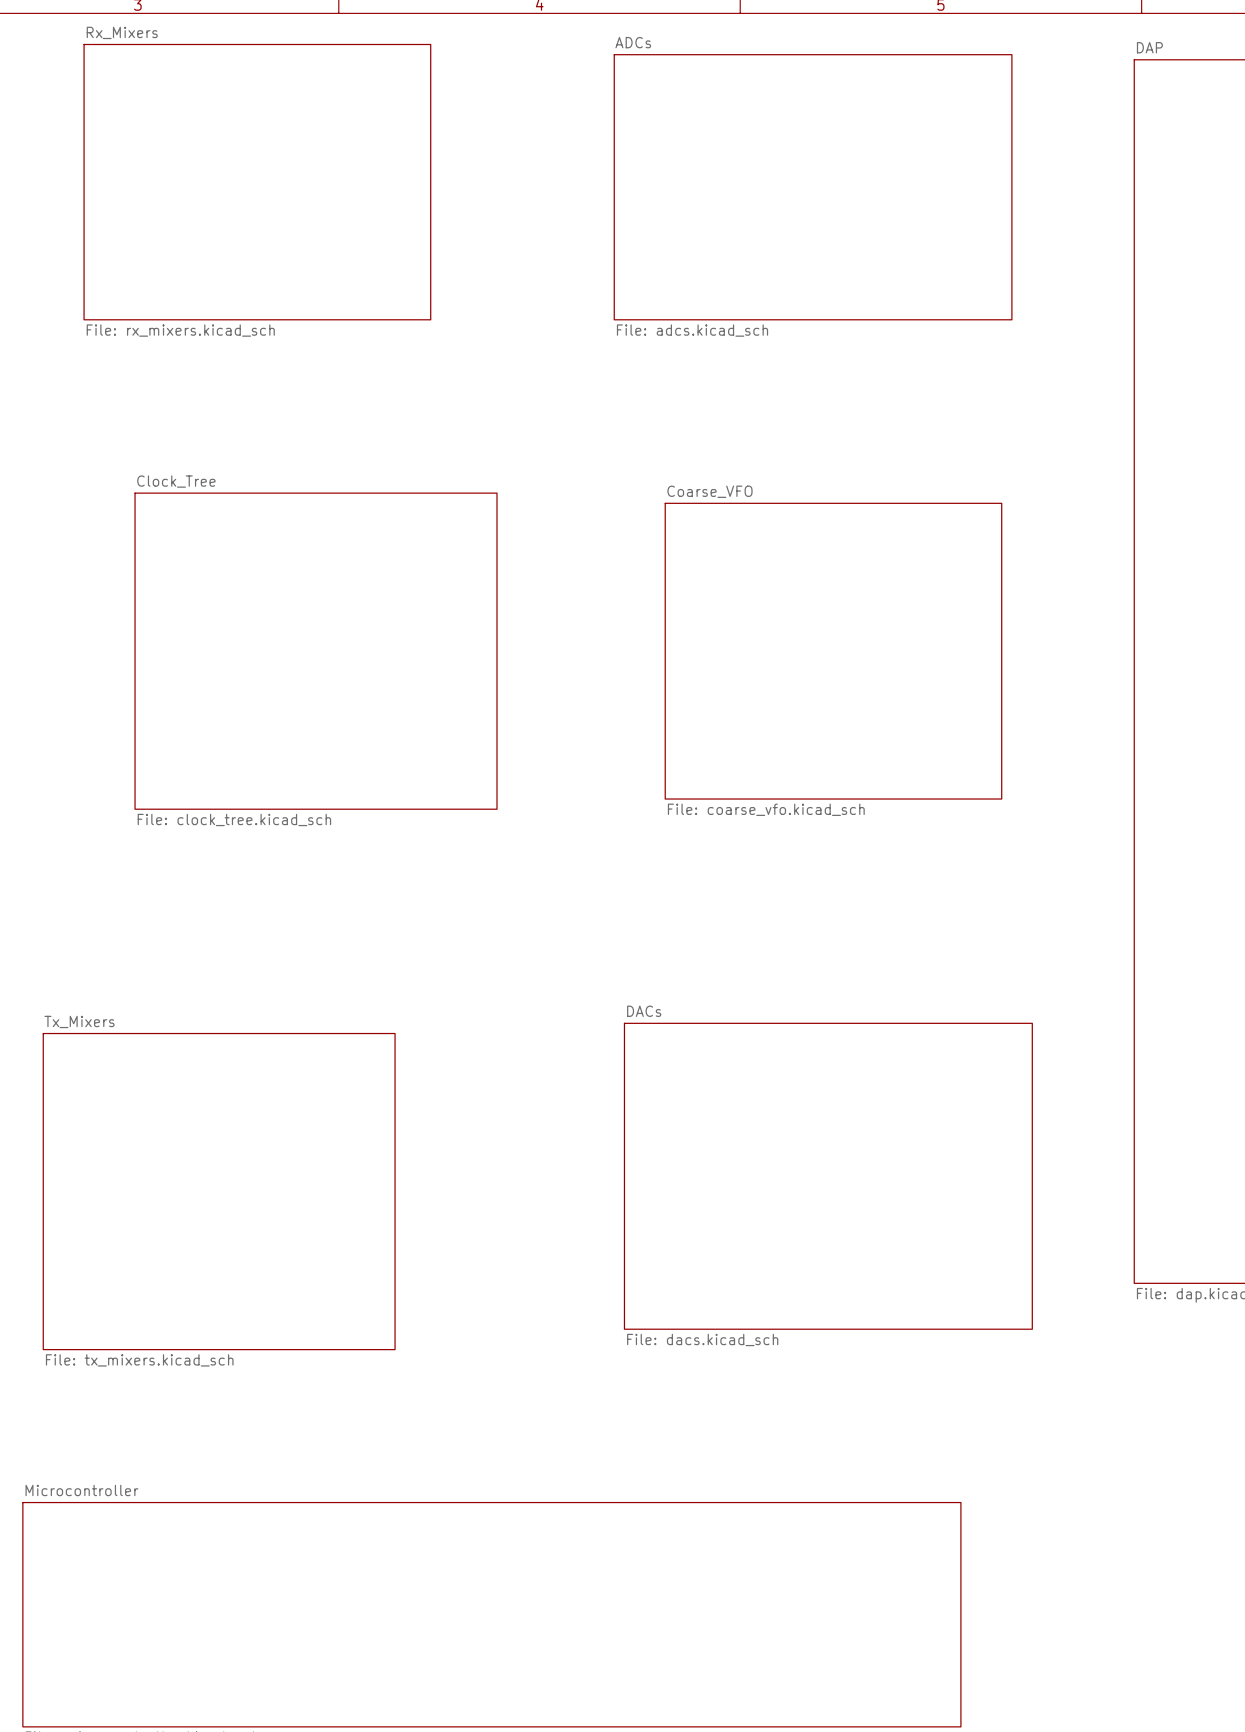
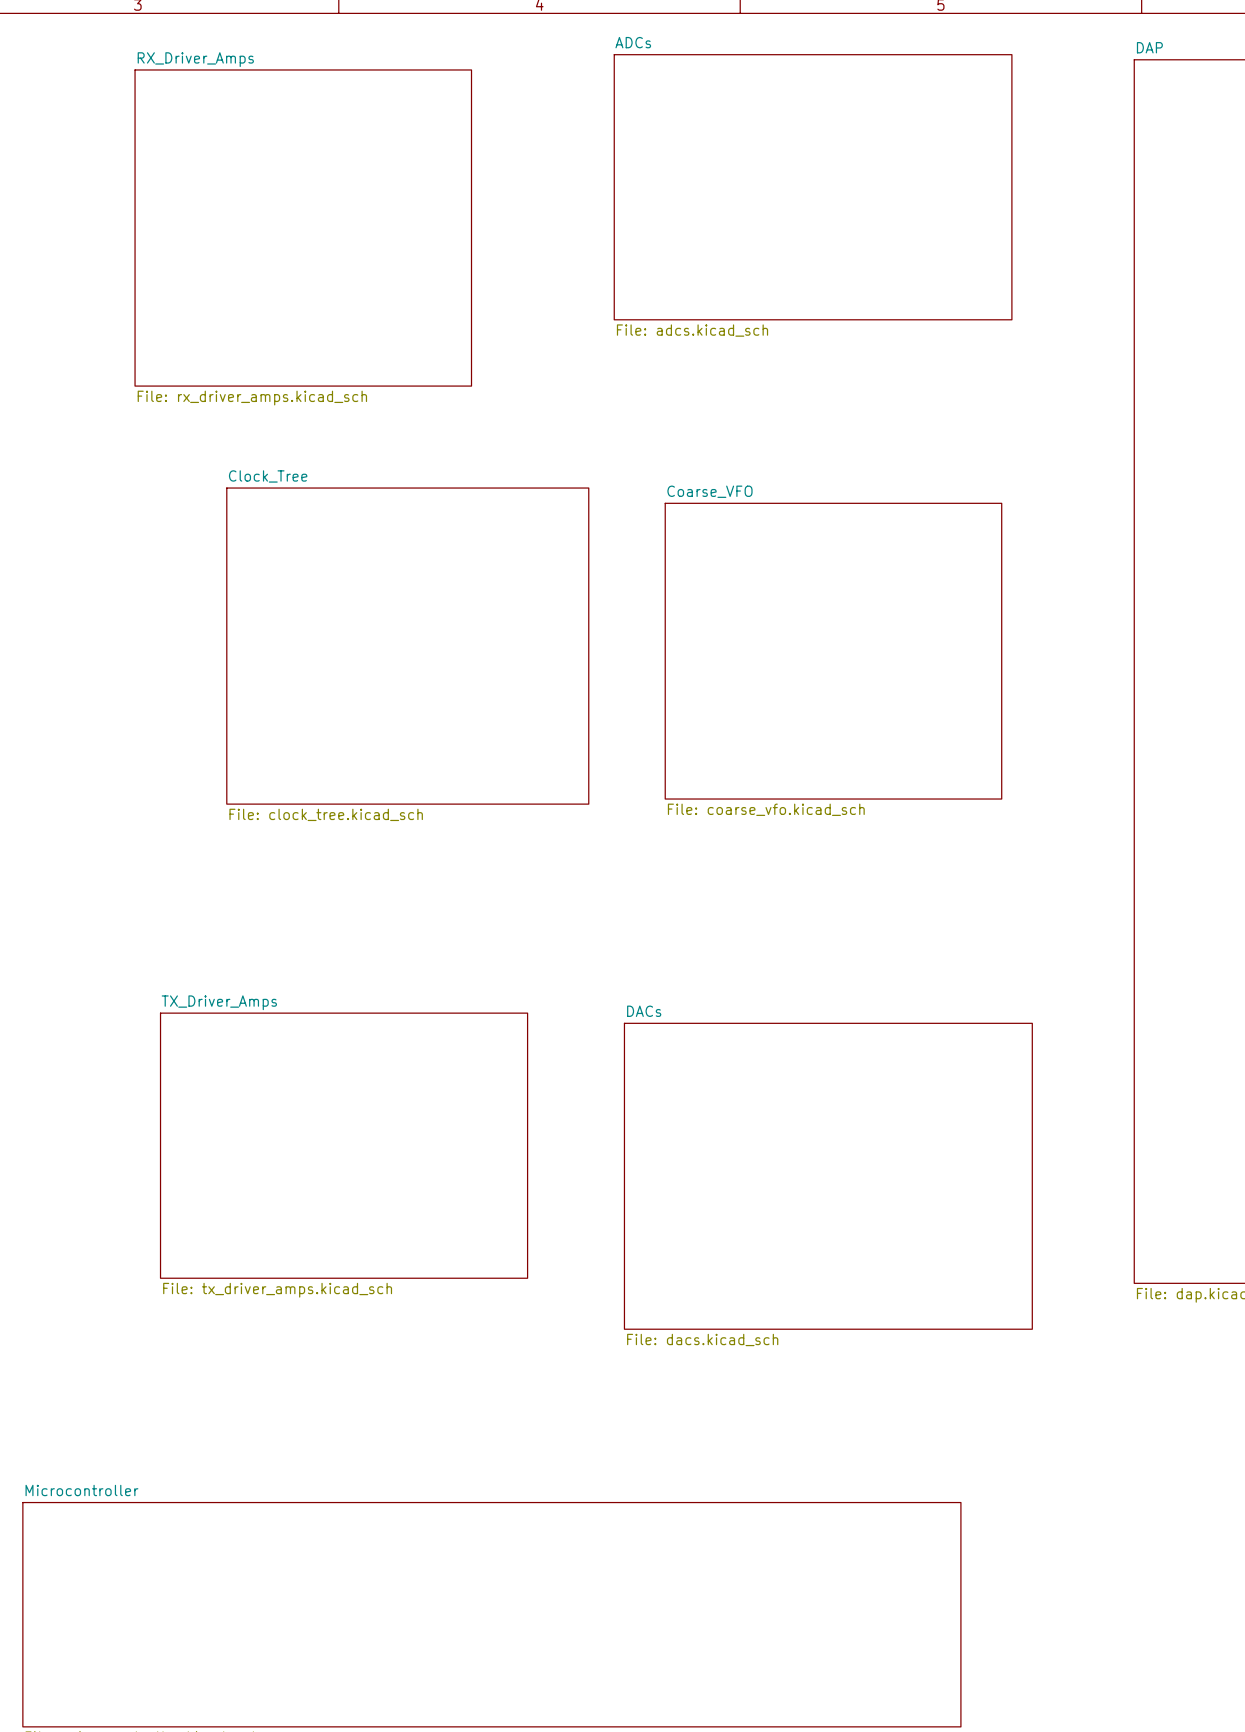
sheet Rx_Mixers: File: rx_mixers.kicad_sch (257, 182) -> none
sheet RX_Driver_Amps: none -> File: rx_driver_amps.kicad_sch (303, 228)
sheet Clock_Tree position: (316, 651) -> (407, 646)
sheet TX_Driver_Amps: none -> File: tx_driver_amps.kicad_sch (344, 1145)
sheet Tx_Mixers: File: tx_mixers.kicad_sch (219, 1191) -> none

